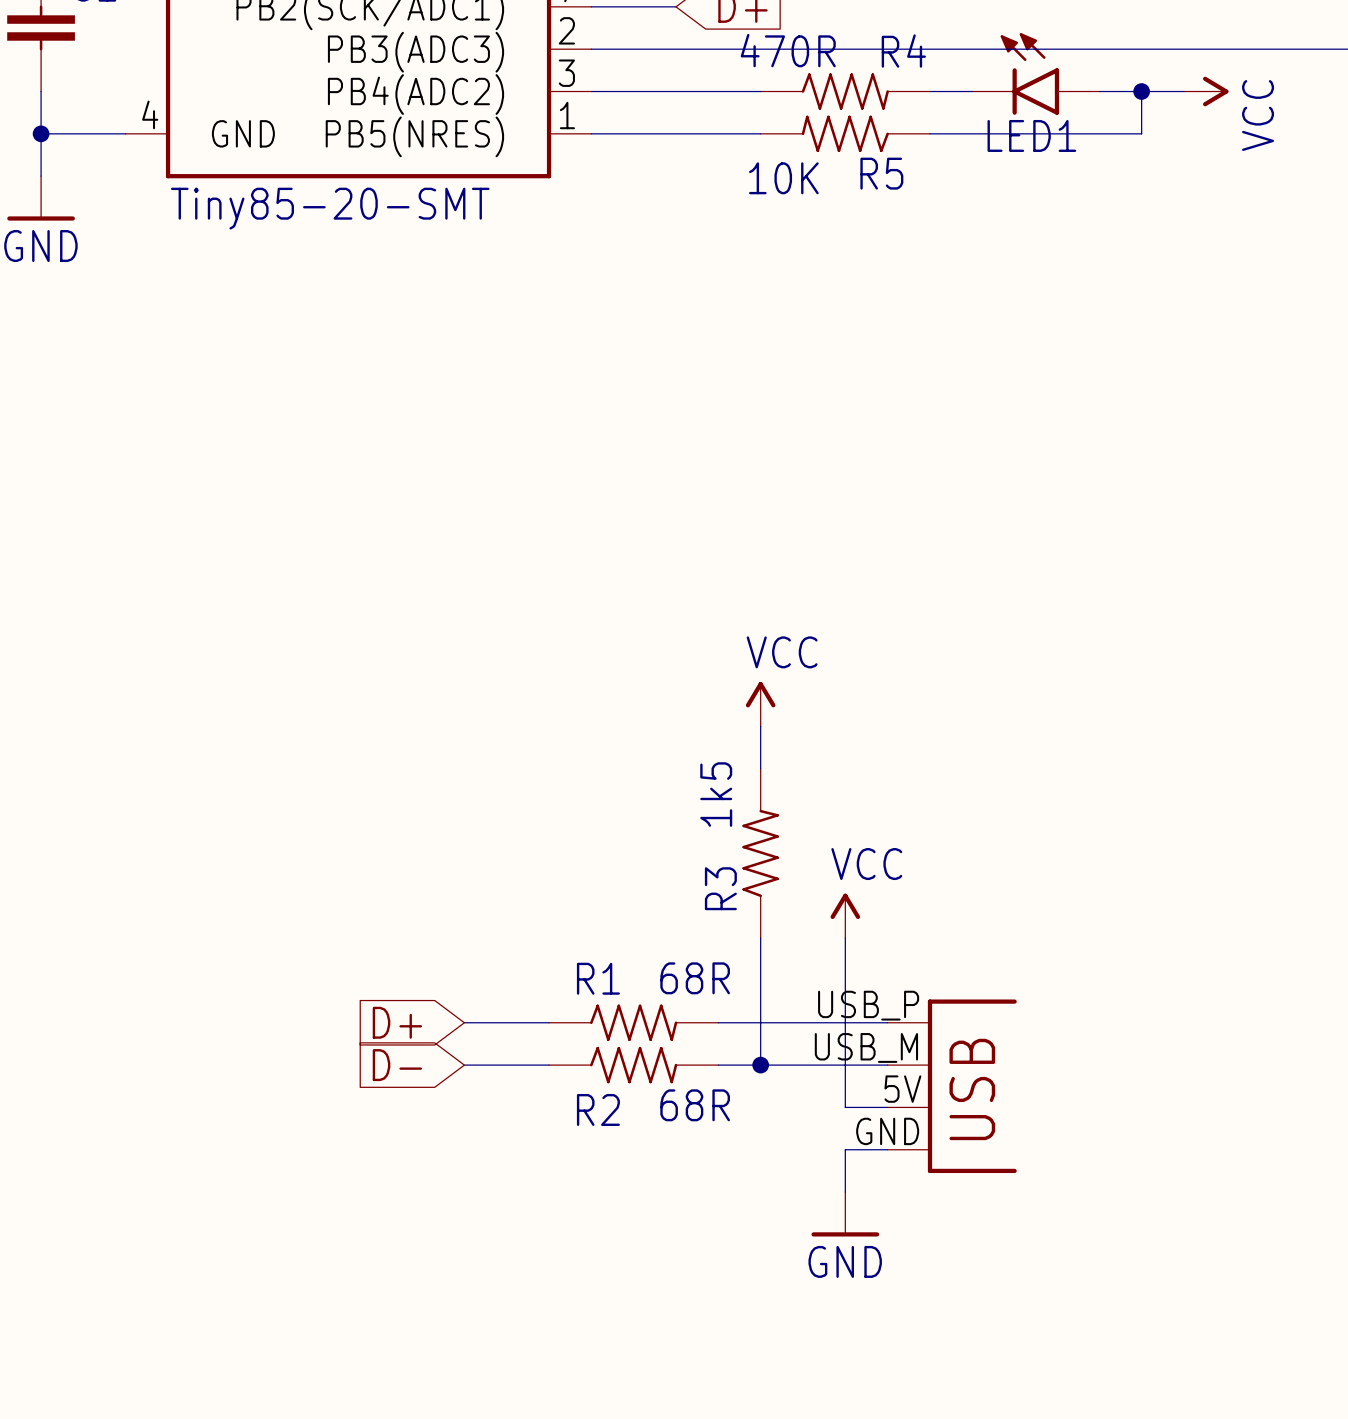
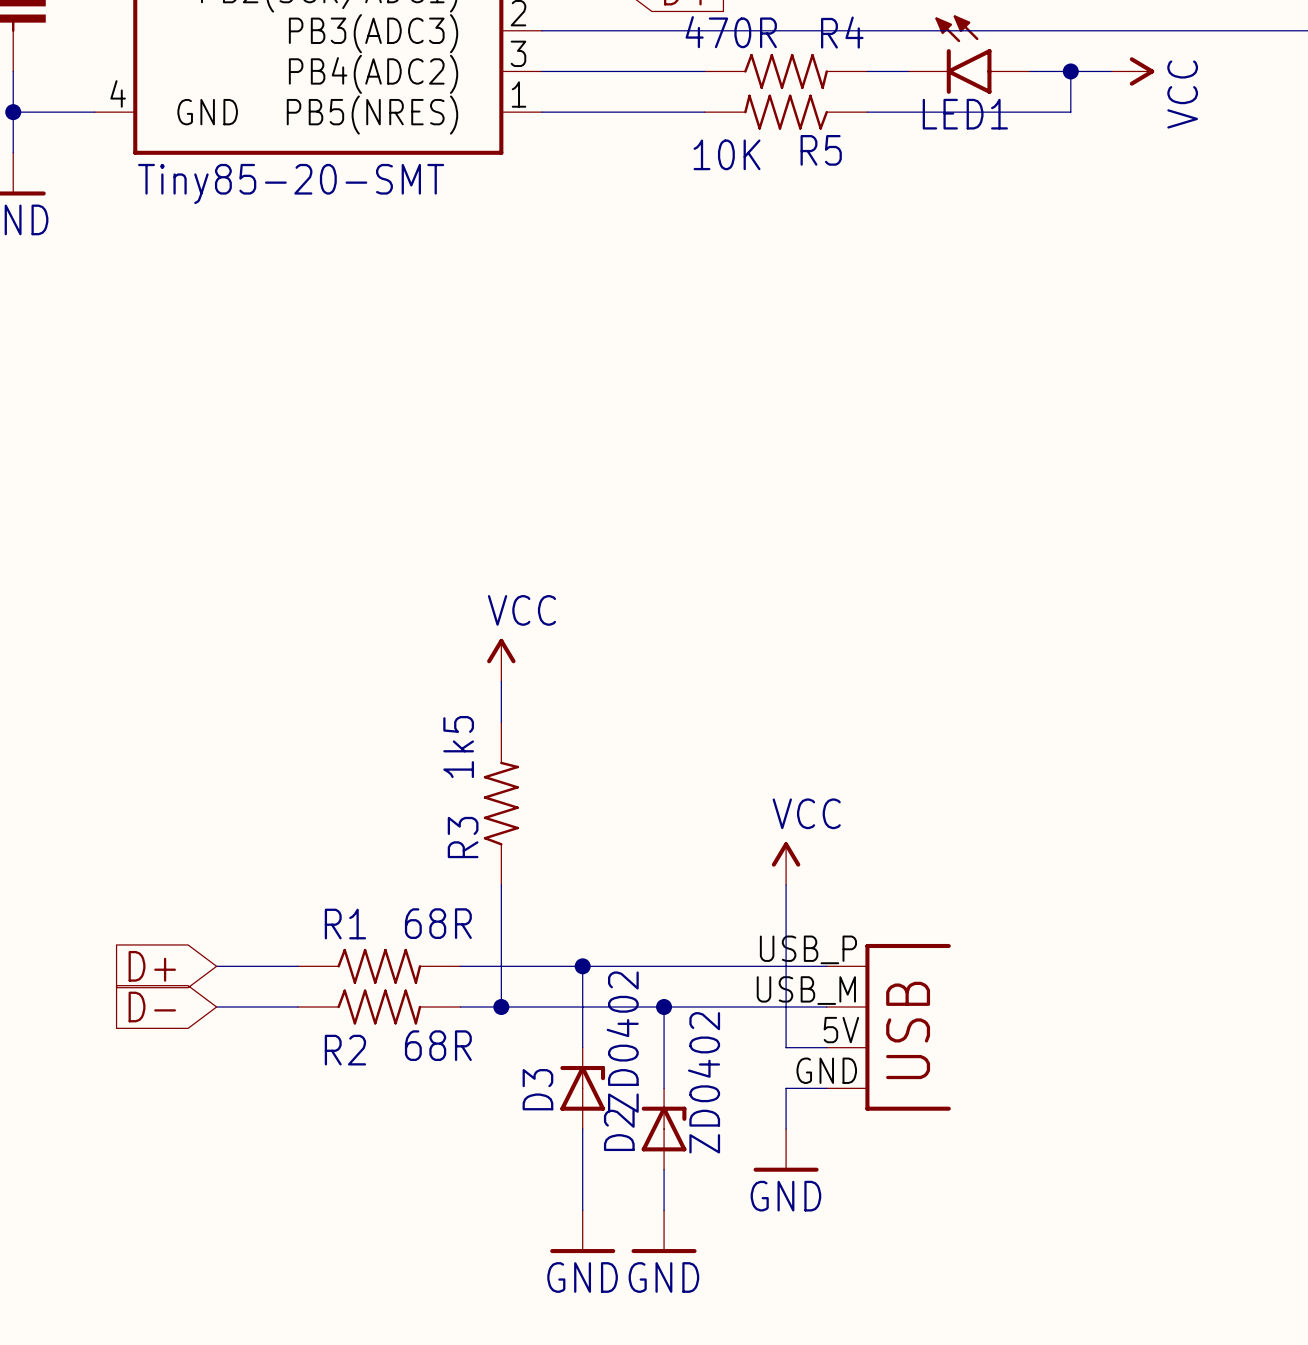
power symbol position: VCC (760, 704) -> VCC (501, 660)
wire: (760, 726) (760, 768) -> (501, 681) (501, 722)
R3 position: (760, 853) -> (501, 803)
wire: none -> (501, 884) (501, 1007) (664, 1007) (664, 1088)
wire: (760, 938) (760, 1065) -> none
wire: none -> (216, 966) (297, 966)
global label position: D+ (397, 1022) -> D+ (152, 966)
wire: none -> (582, 966) (582, 1047)
R1 position: (633, 1022) -> (379, 966)
junction: none -> (582, 966)
wire: none -> (216, 1007) (297, 1007)
global label position: D- (397, 1065) -> D- (152, 1007)
junction: none -> (501, 1007)
R2 position: (633, 1065) -> (379, 1007)
junction position: (760, 1065) -> (664, 1007)
D3: none -> ZD0402 (582, 1088)
wire: none -> (582, 1129) (582, 1210)
D2: none -> ZD0402 (664, 1129)
wire: none -> (664, 1169) (664, 1210)
power symbol: none -> GND (582, 1231)
power symbol: none -> GND (664, 1231)

